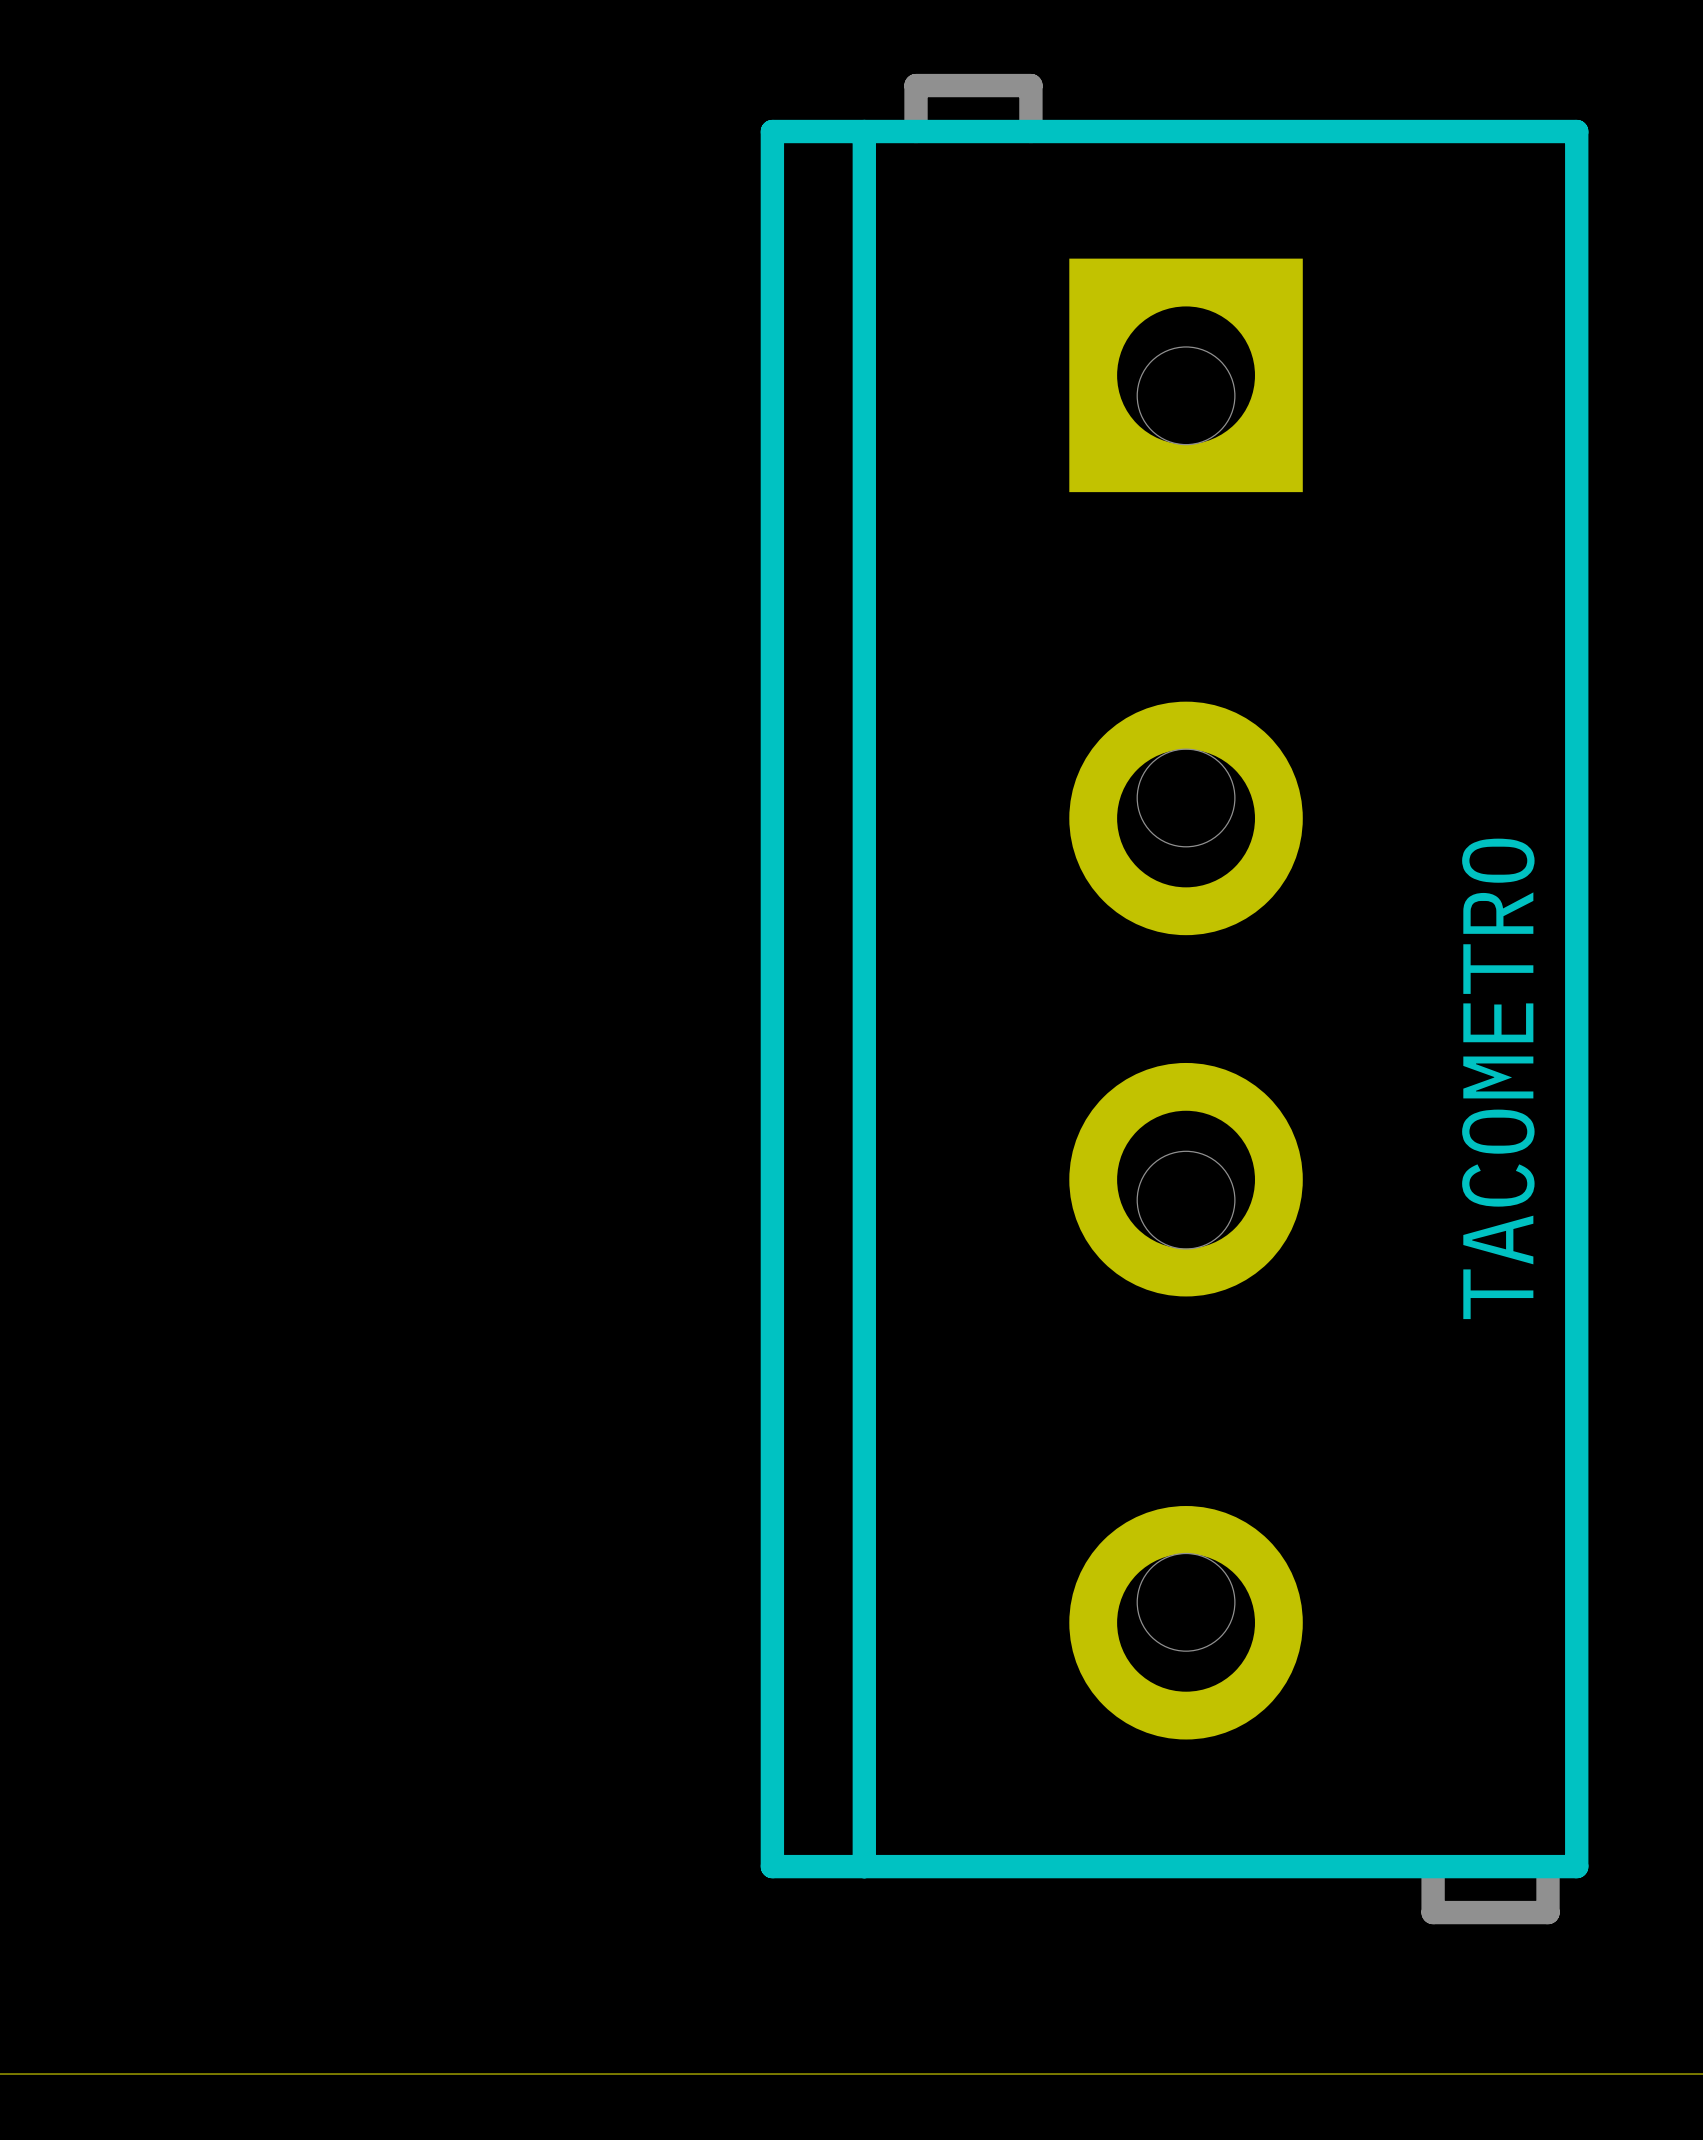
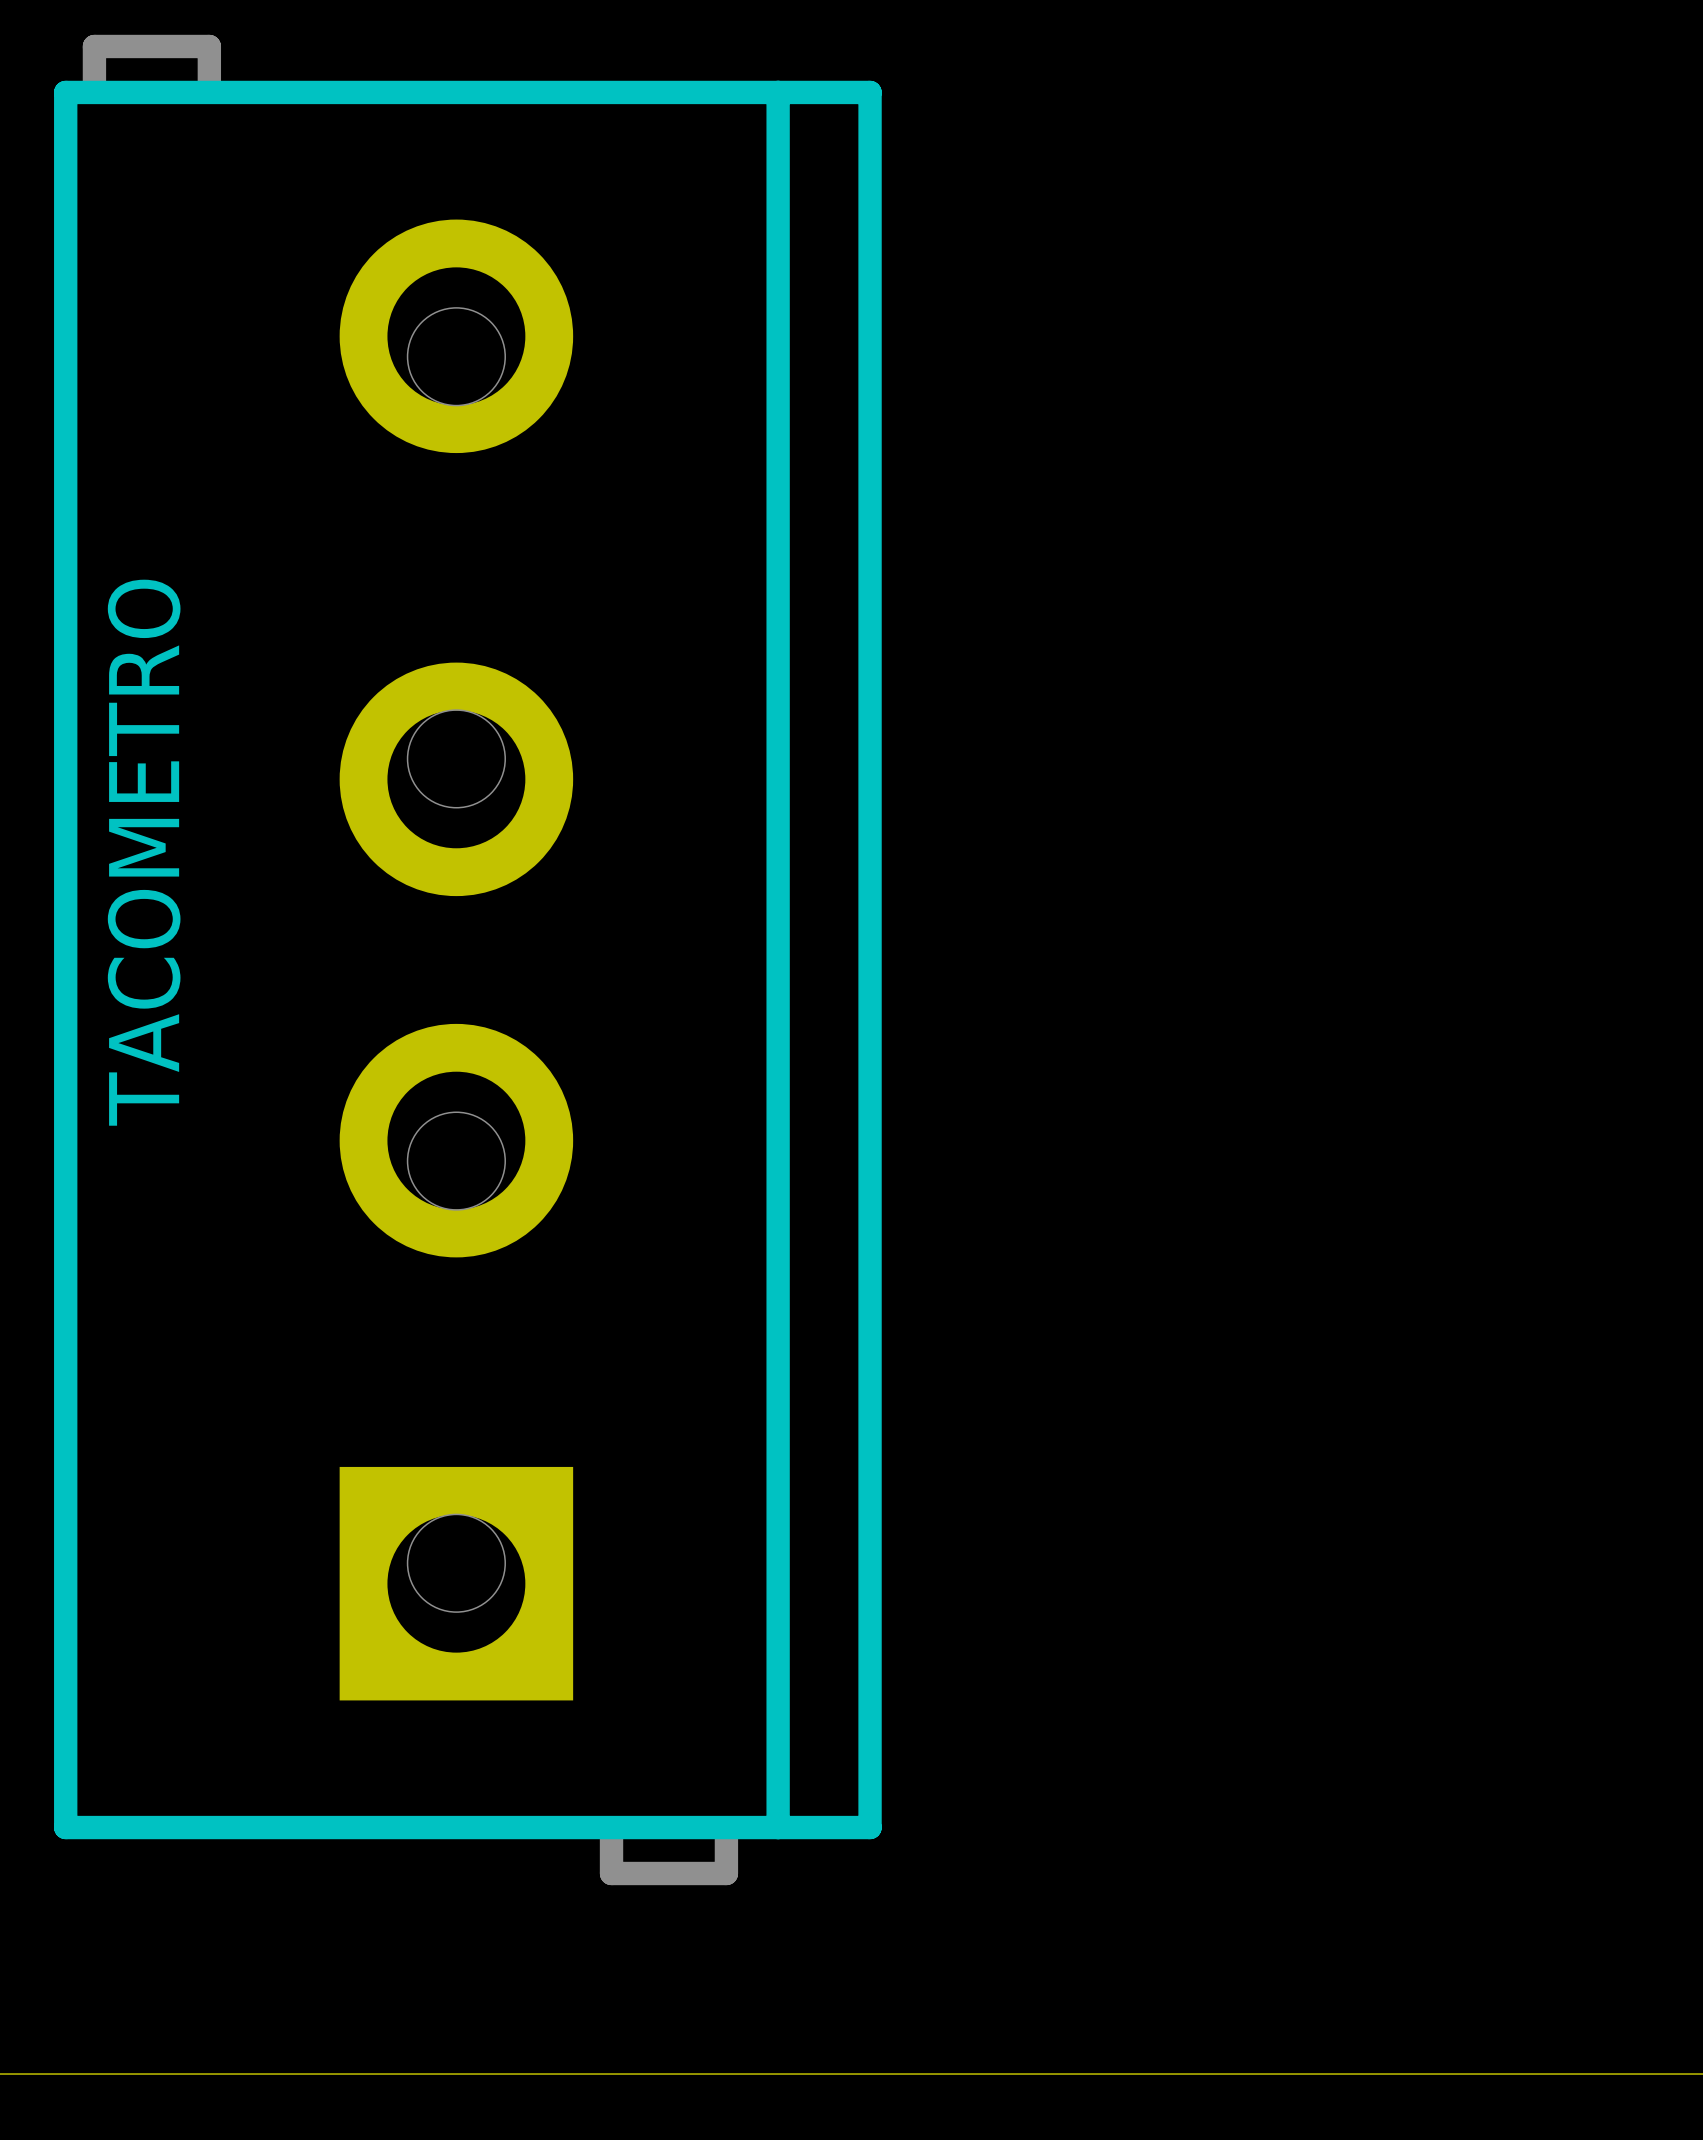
TACOMETRO rotation: 0° (1174, 999) -> 180° (467, 959)

